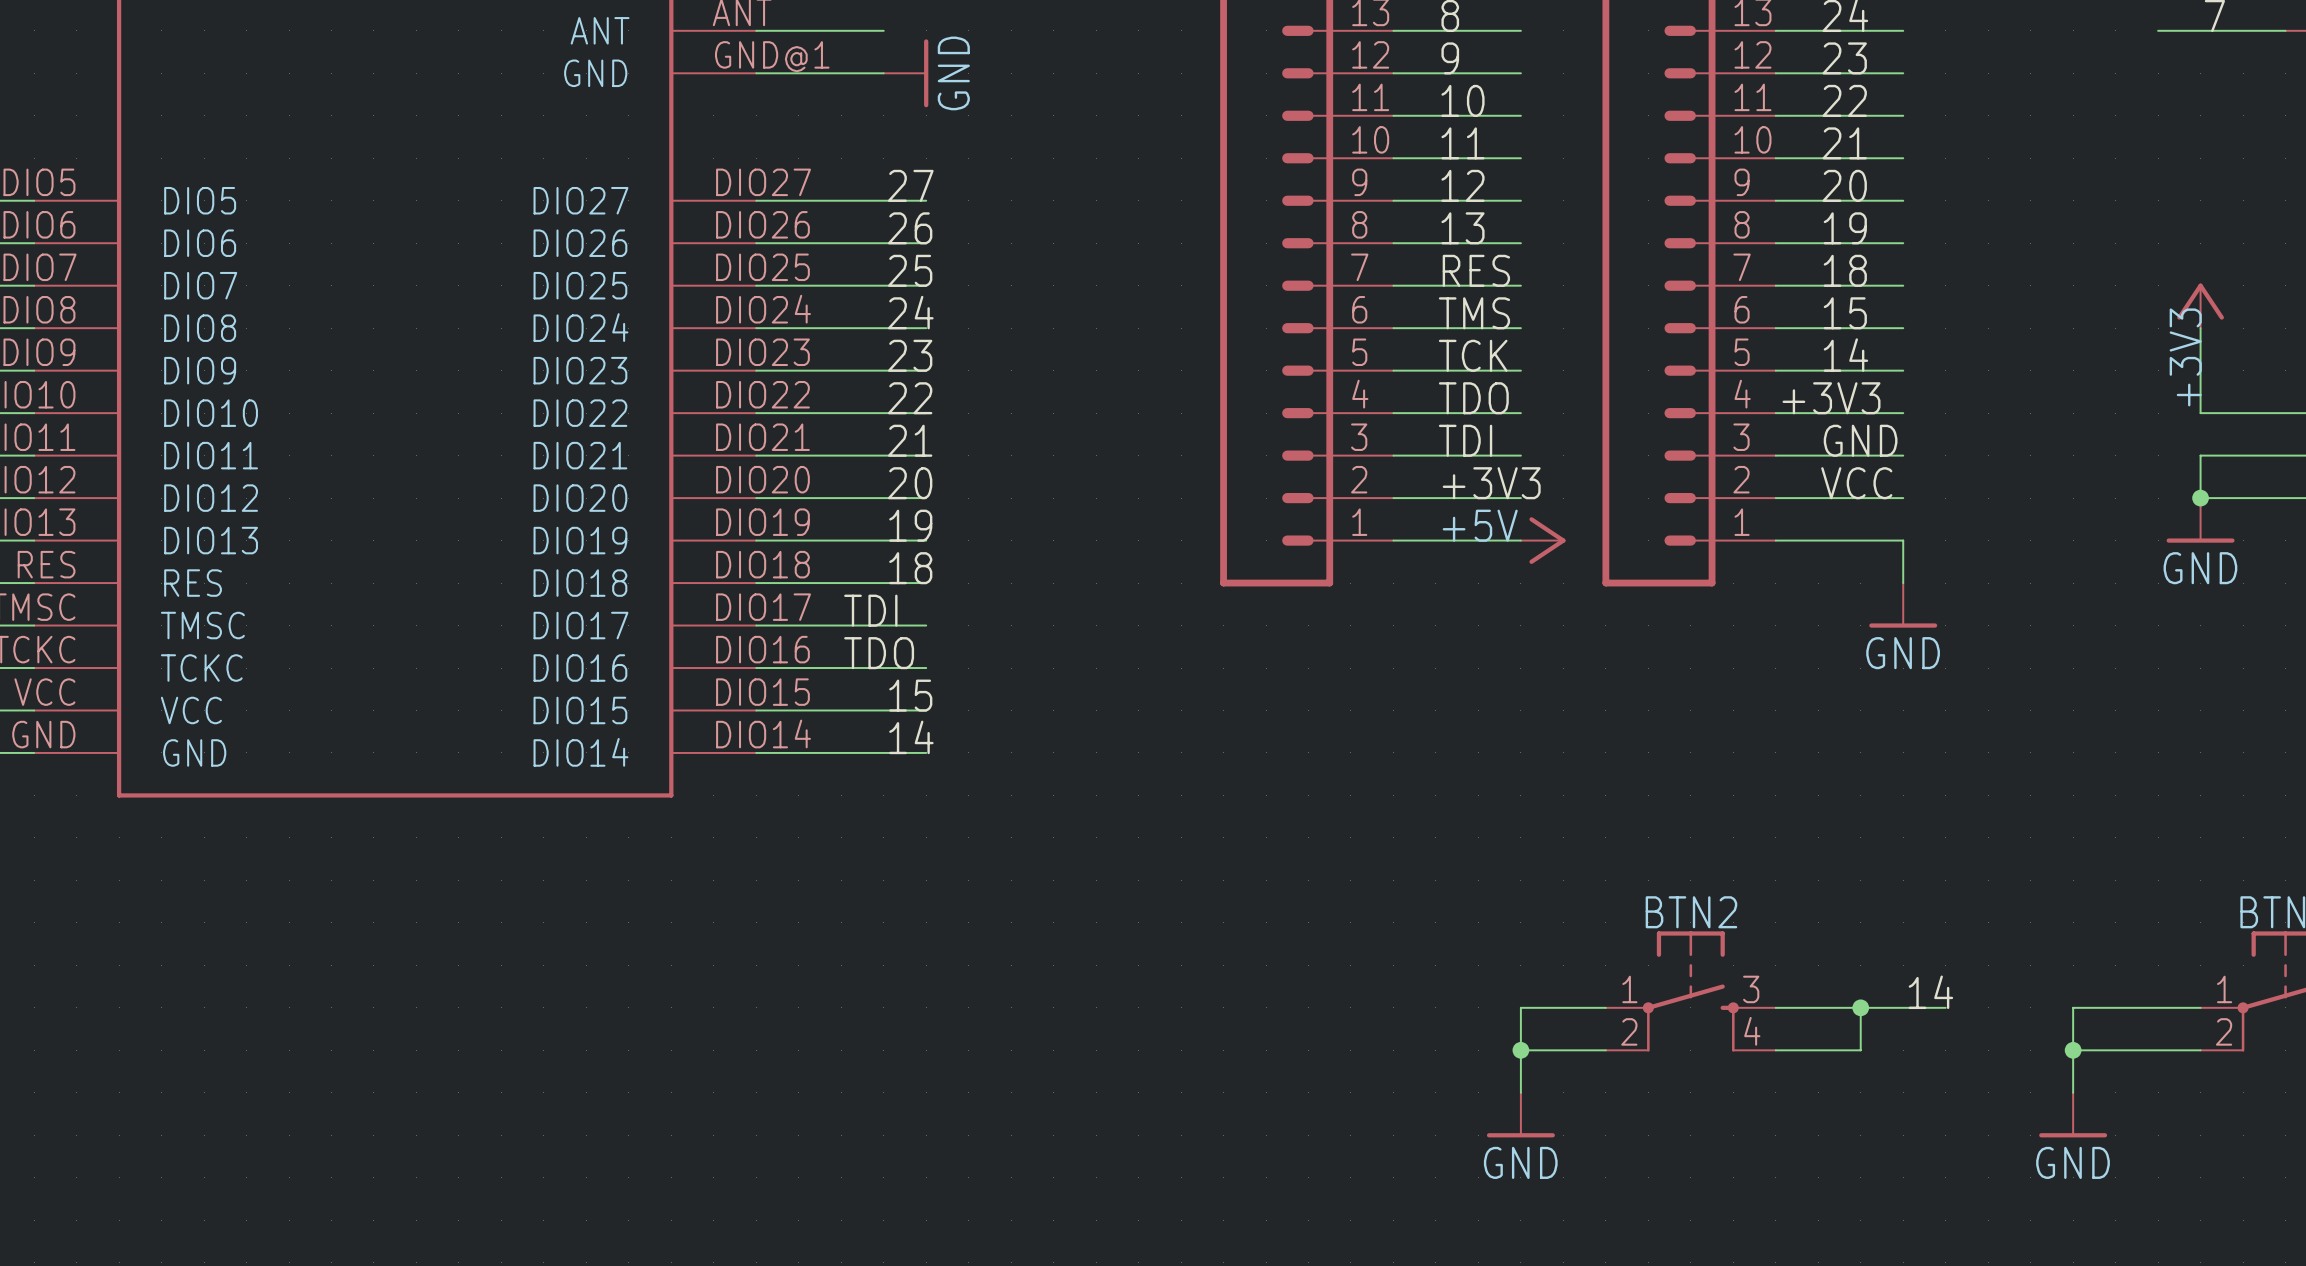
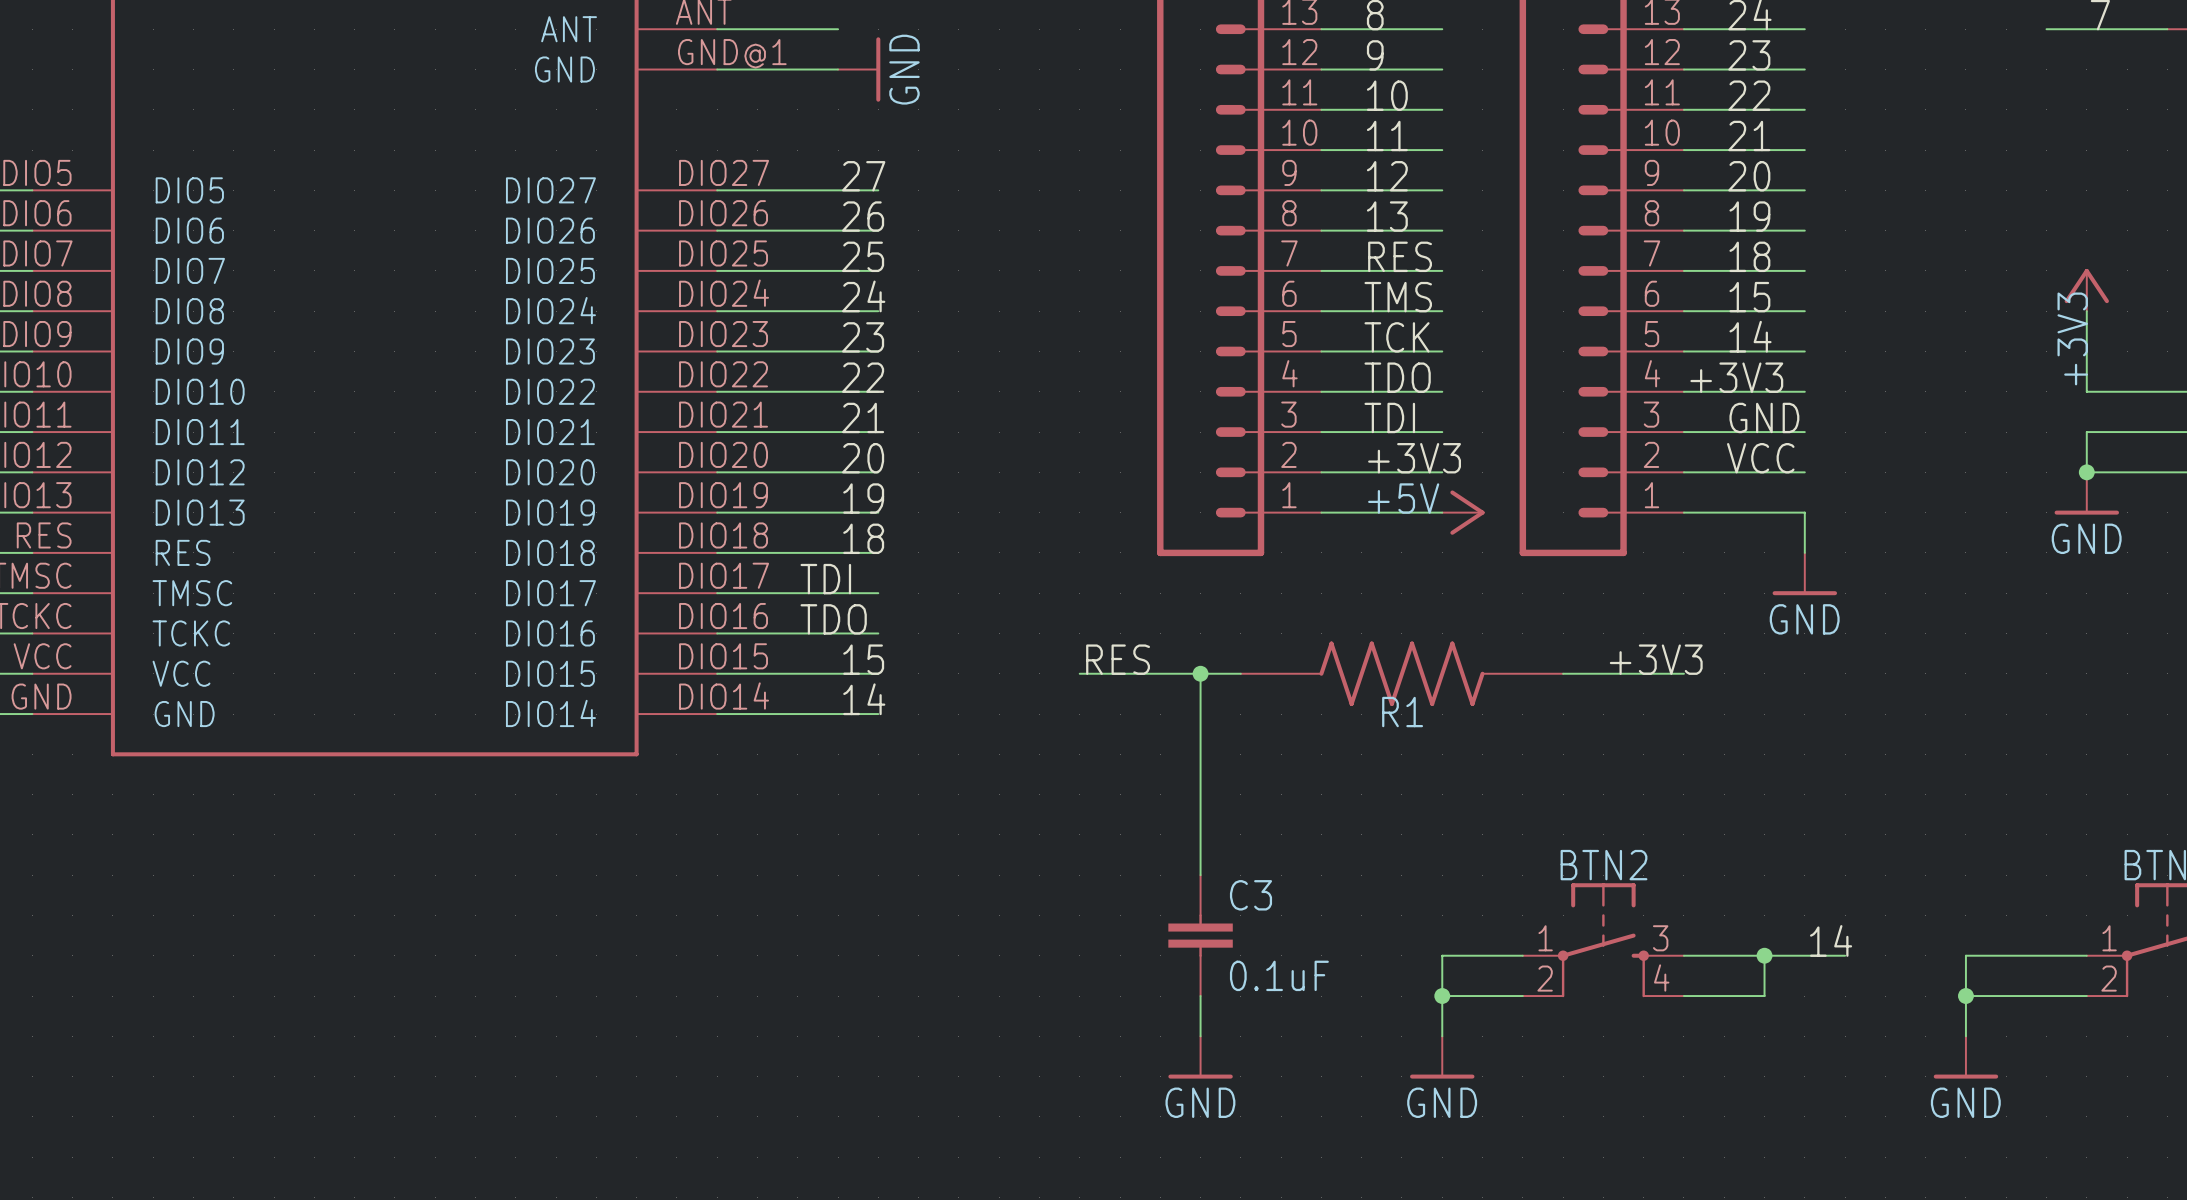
label: none -> RES (1118, 659)
label: none -> +3V3 (1656, 659)
wire: none -> (1079, 673) (1240, 673)
wire: none -> (1200, 673) (1200, 875)
junction: none -> (1200, 673)
R1: none -> (1401, 673)
wire: none -> (1563, 673) (1683, 673)
C3: none -> 0.1uF (1200, 935)
wire: none -> (1200, 996) (1200, 1036)
power symbol: none -> GND (1200, 1057)

